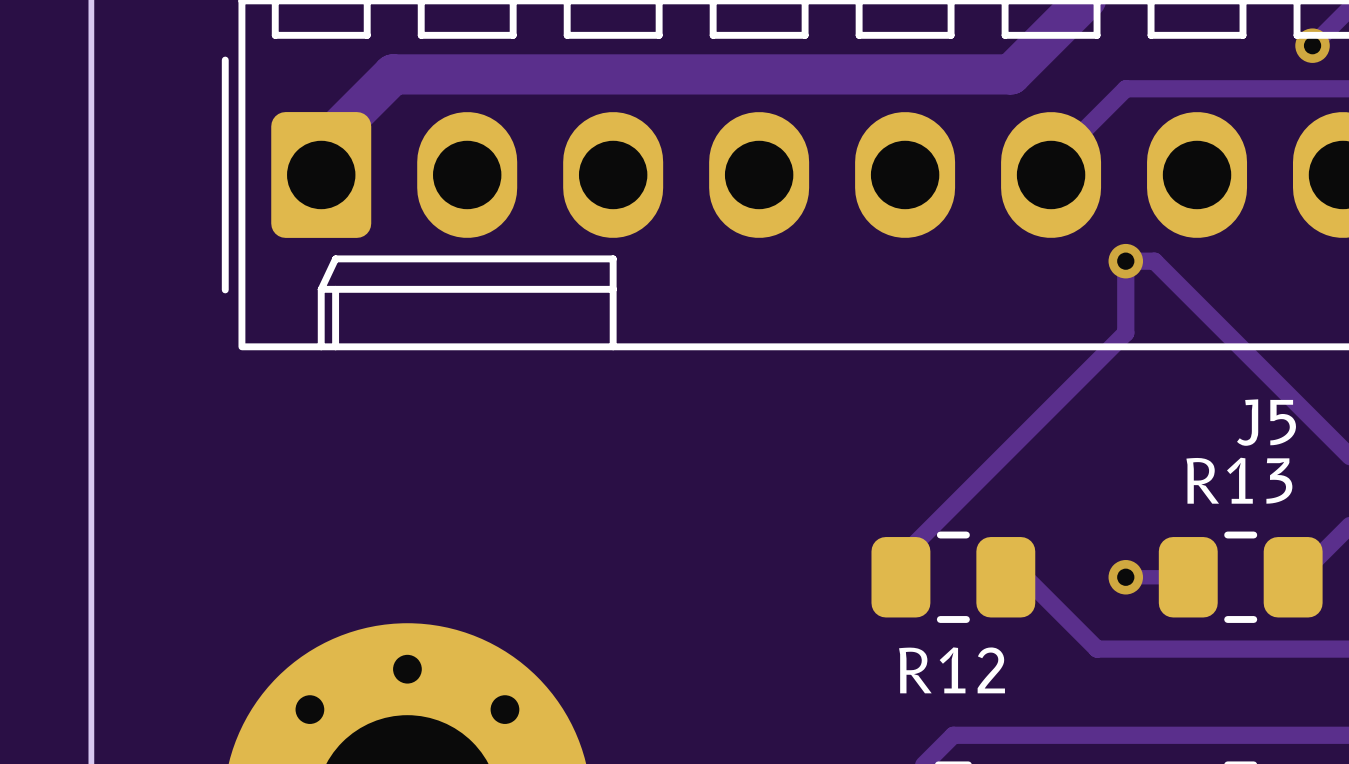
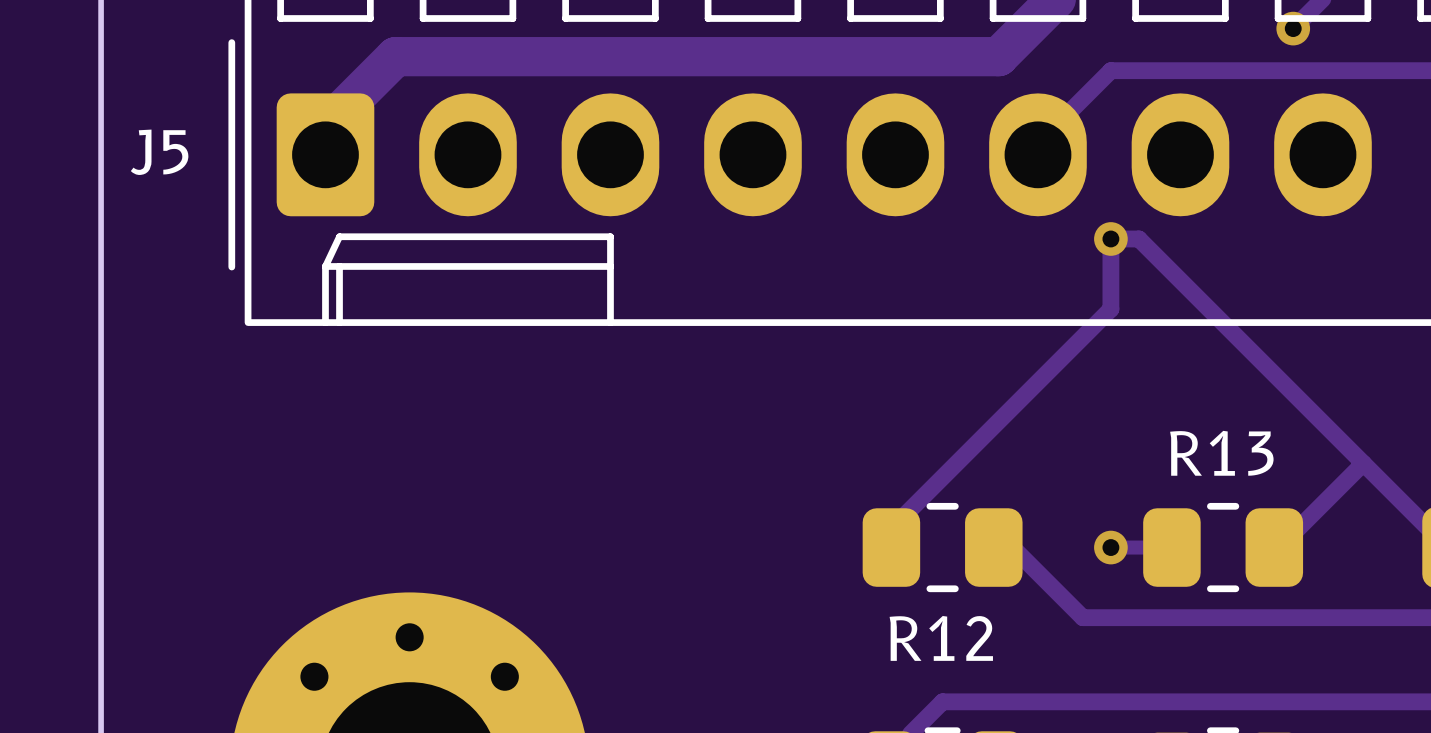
J5 name position: J5 (1266, 422) -> J5 (159, 152)

